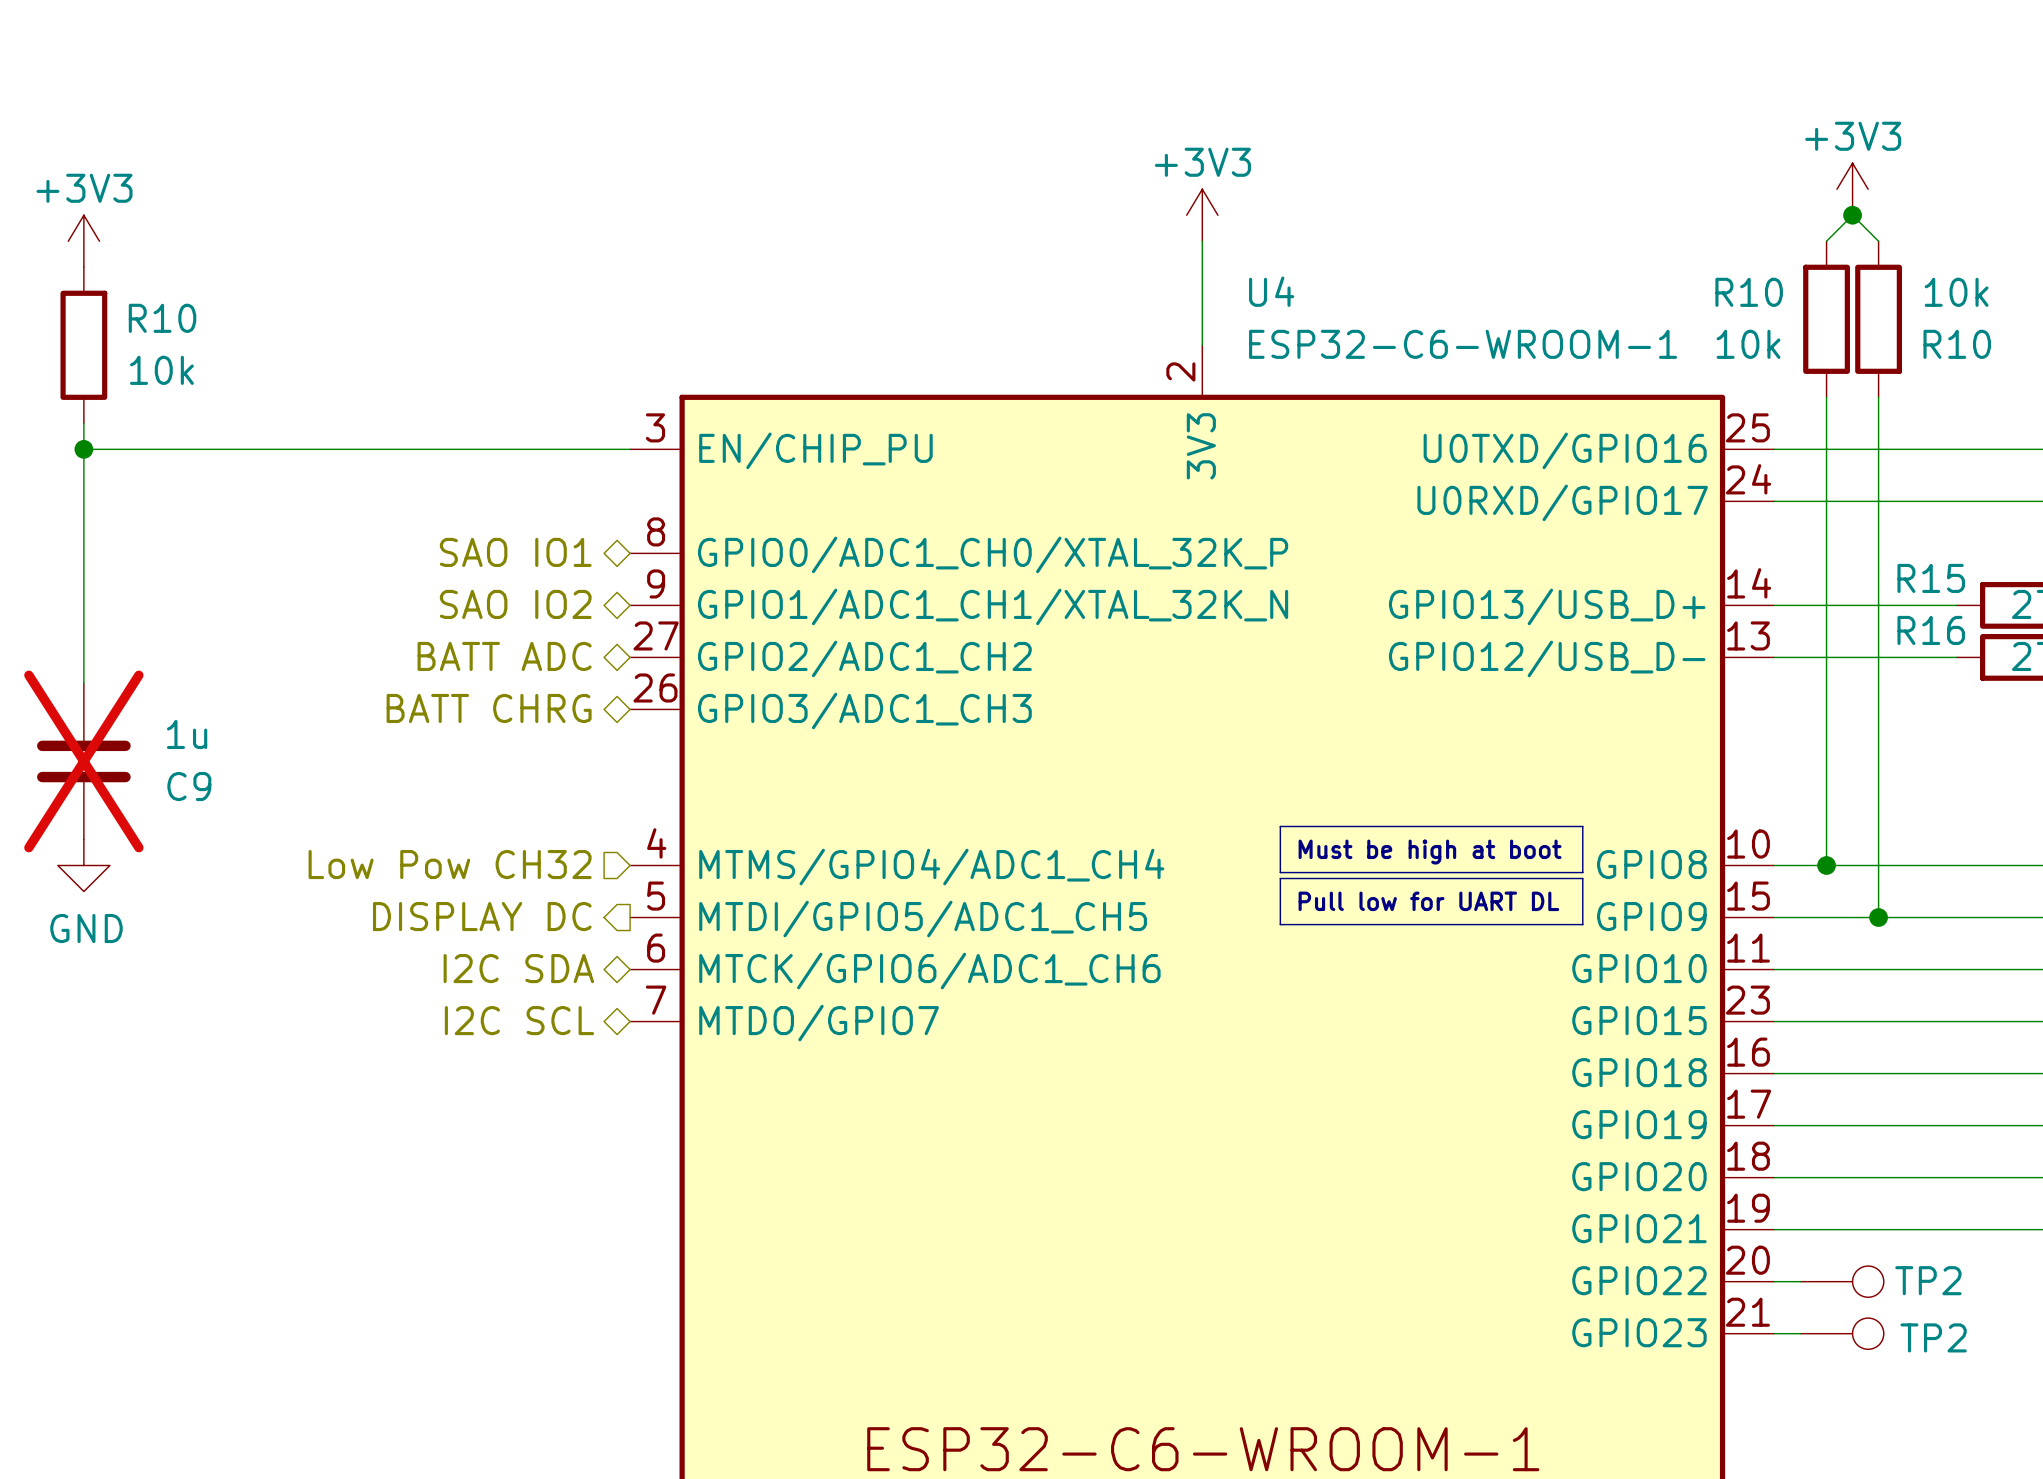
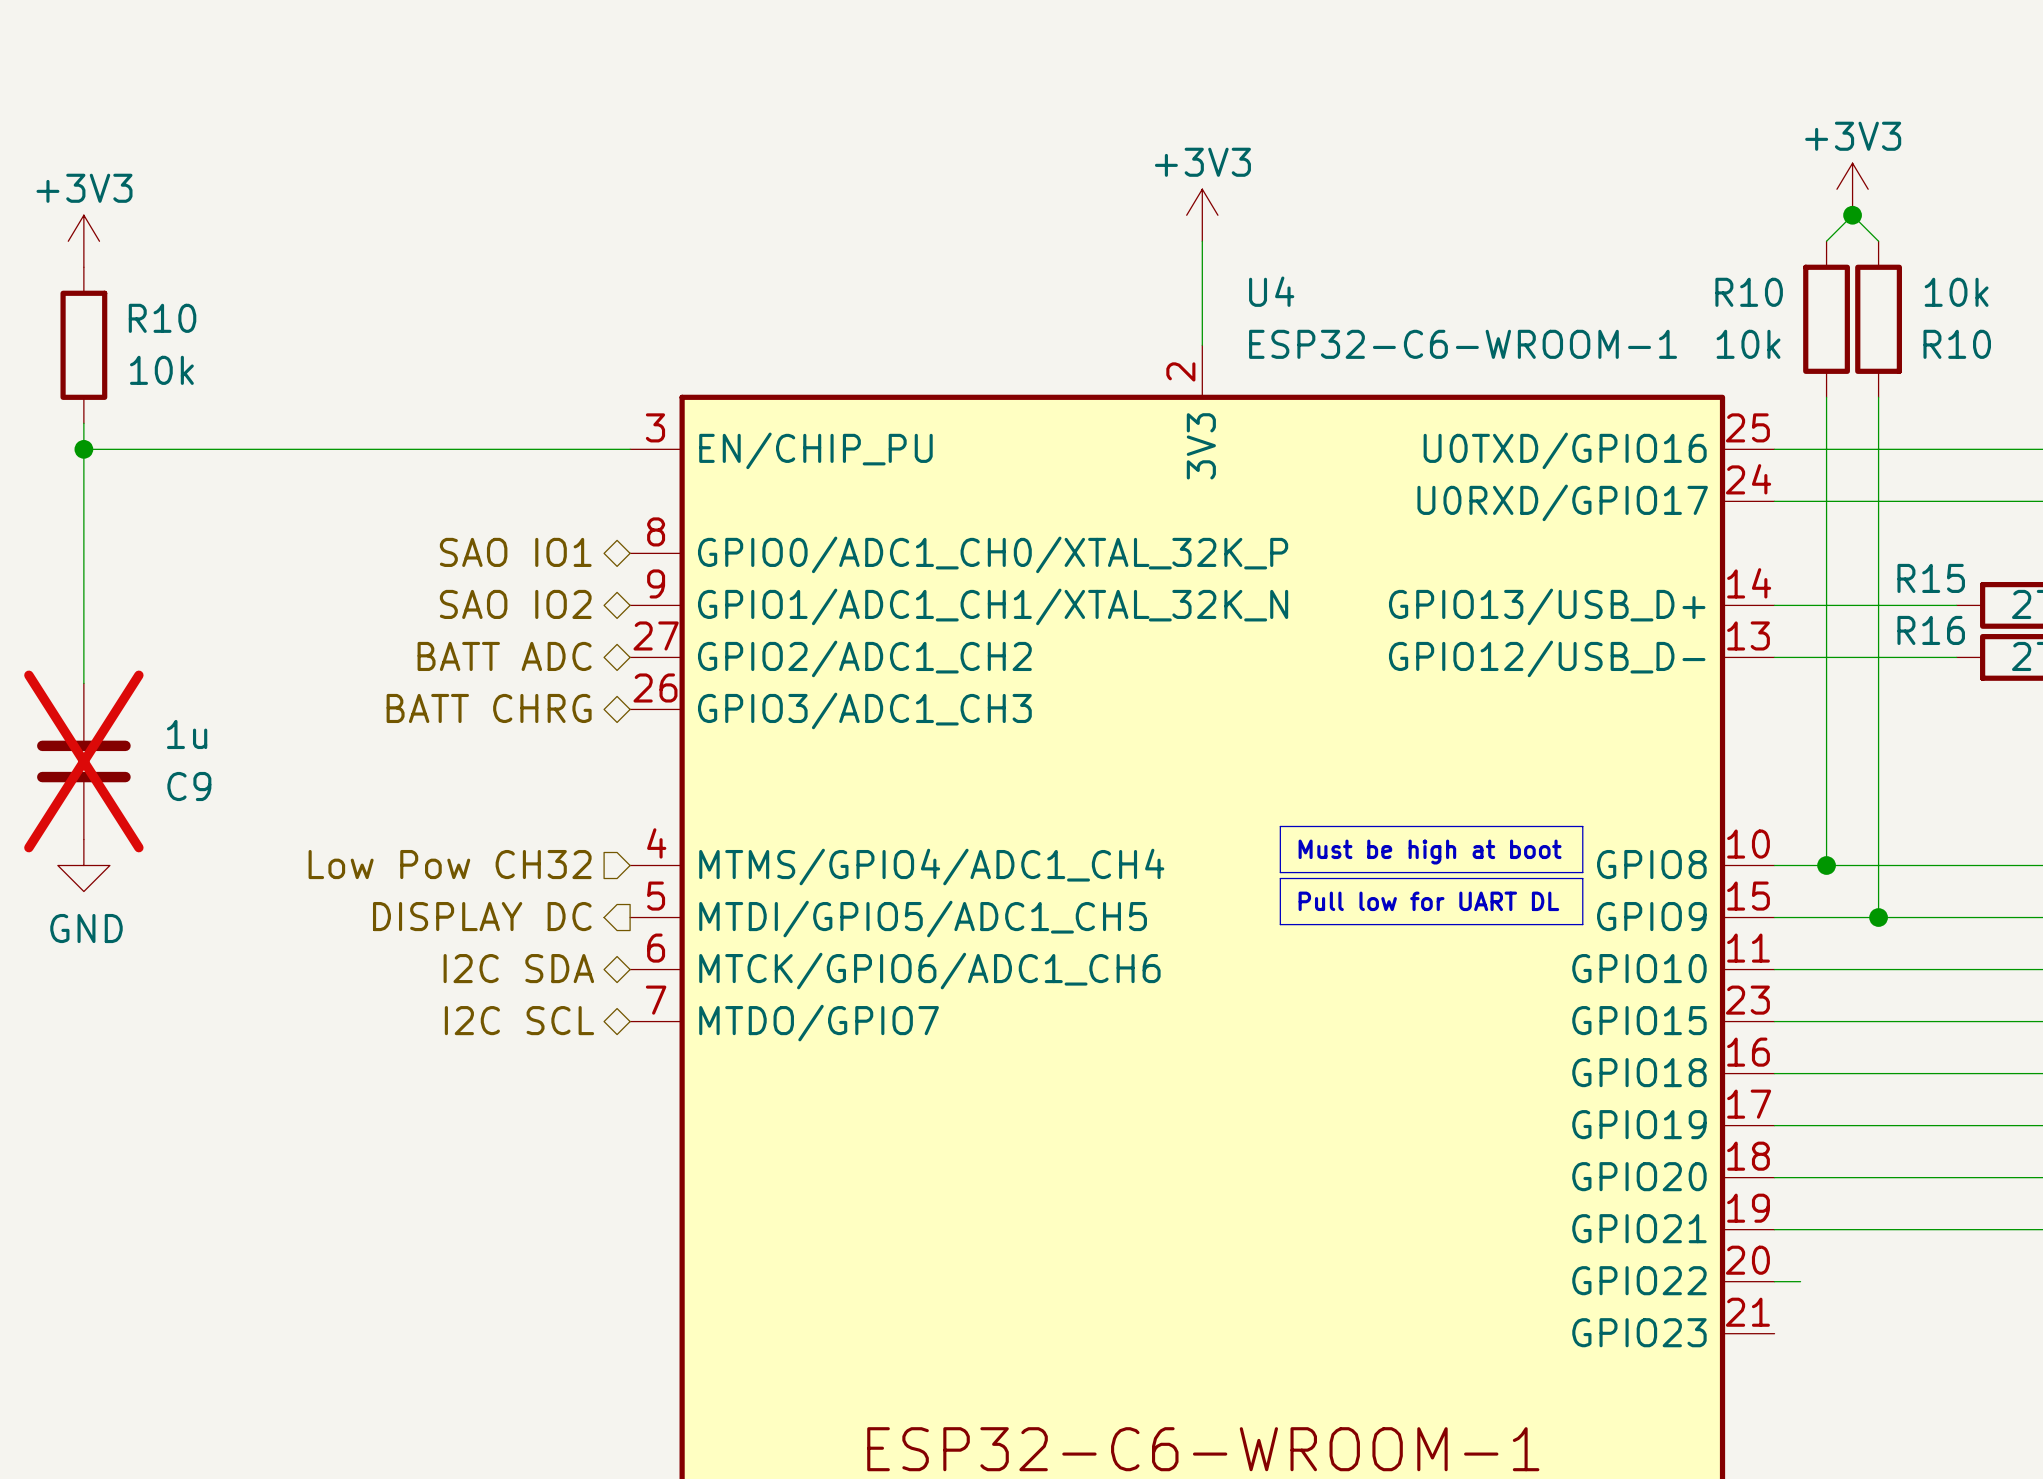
TP2: (1842, 1281) -> none
wire: (1774, 1333) (1800, 1333) -> none
TP2: (1842, 1333) -> none

